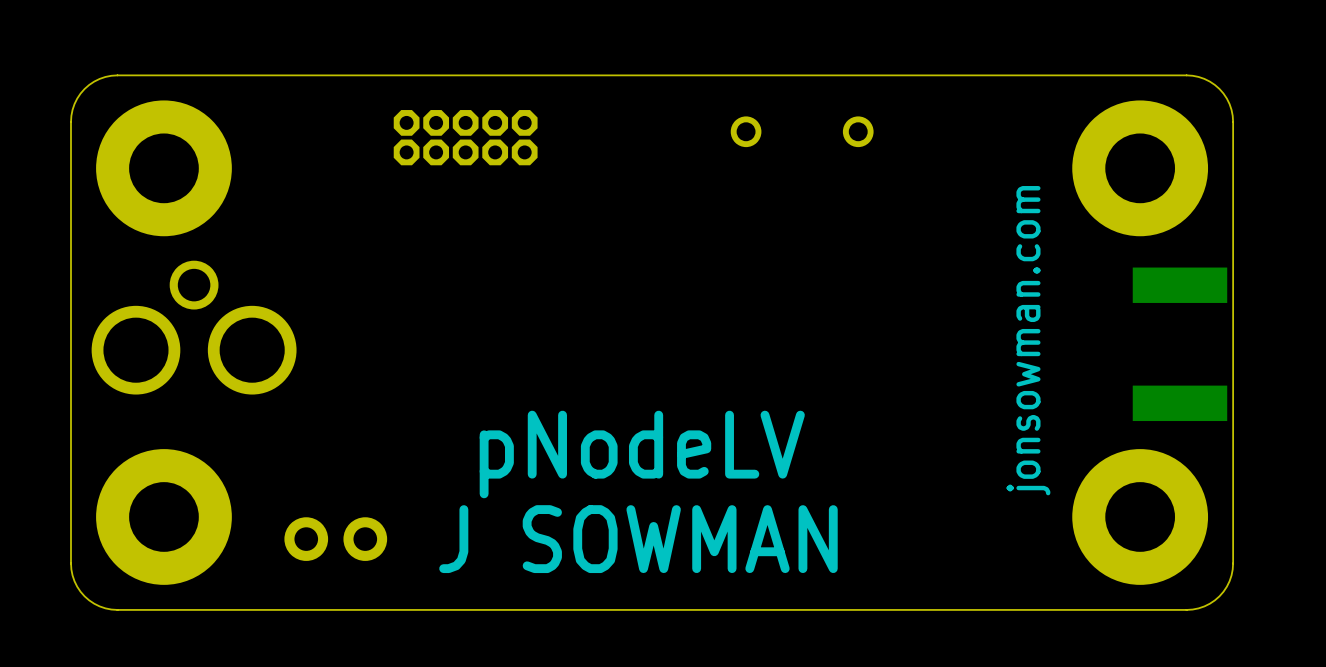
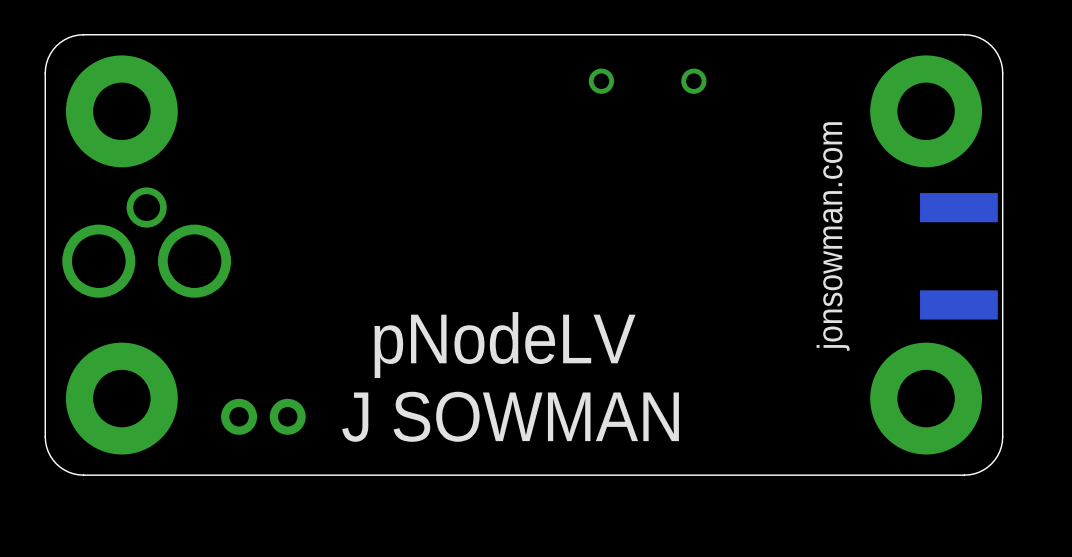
part: (465, 137) -> none

